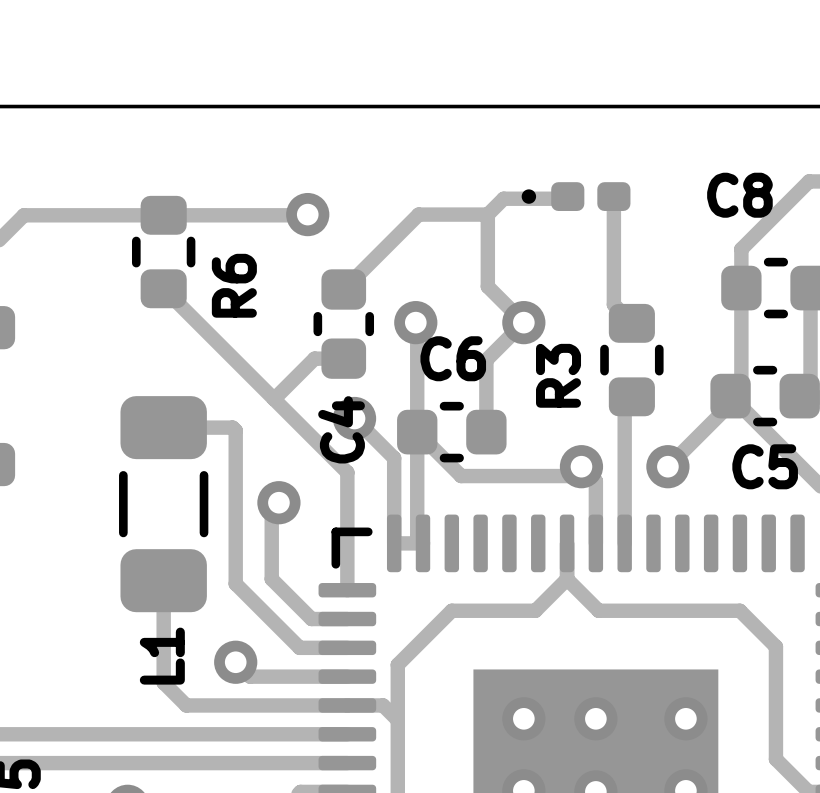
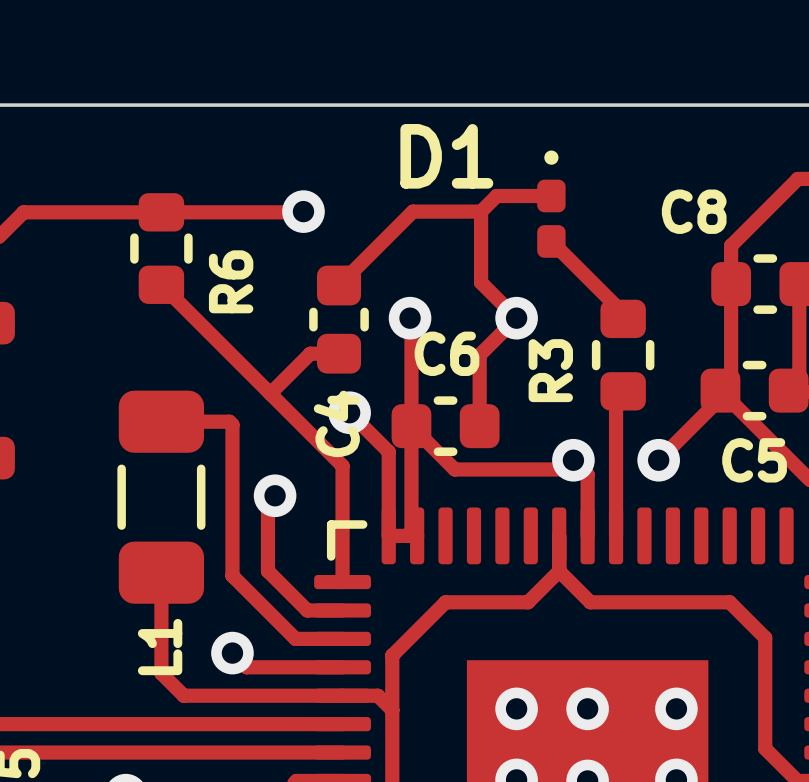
C8 name position: C8 (739, 195) -> C8 (694, 211)
part: (576, 196) -> none
track: (613, 196) (613, 304) (631, 322) -> none
D1: none -> (551, 204)
track: none -> (551, 241) (623, 313)

